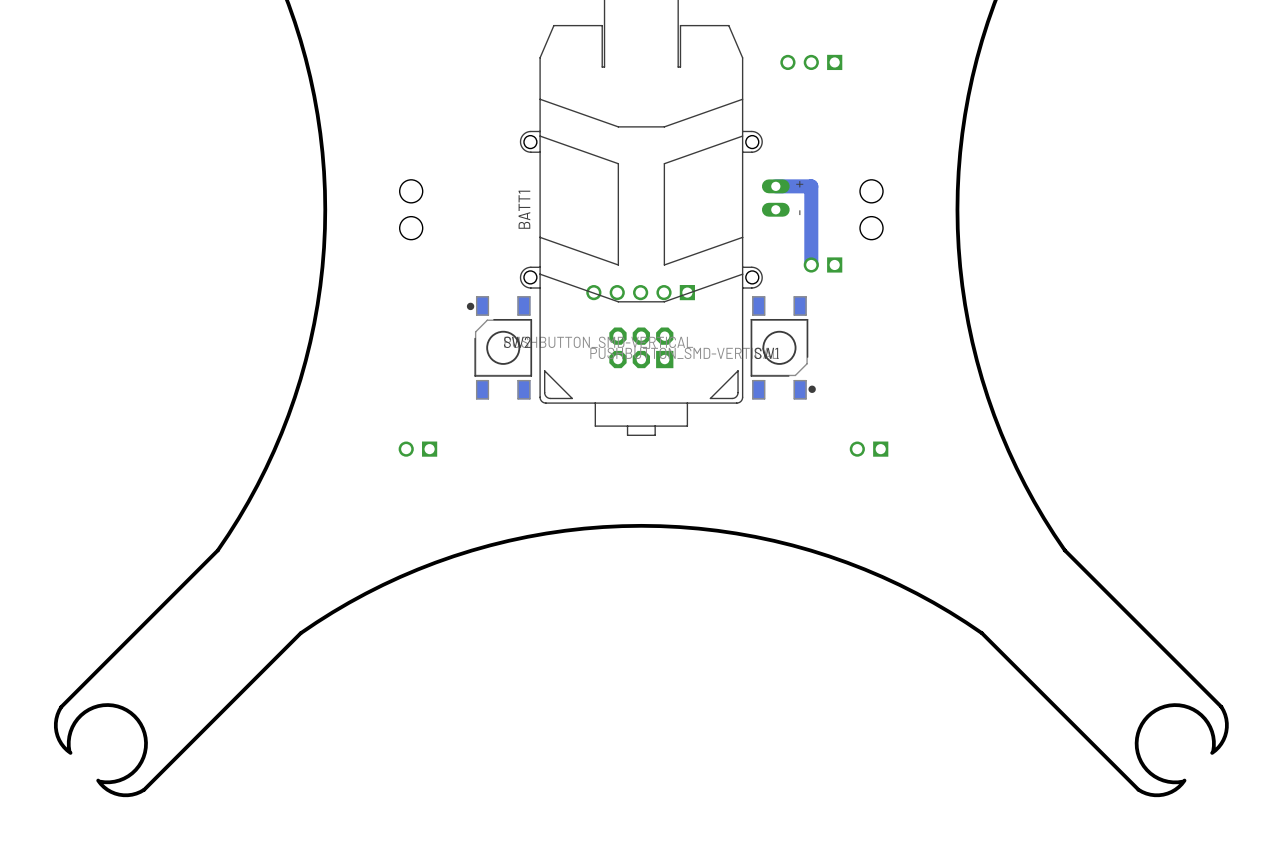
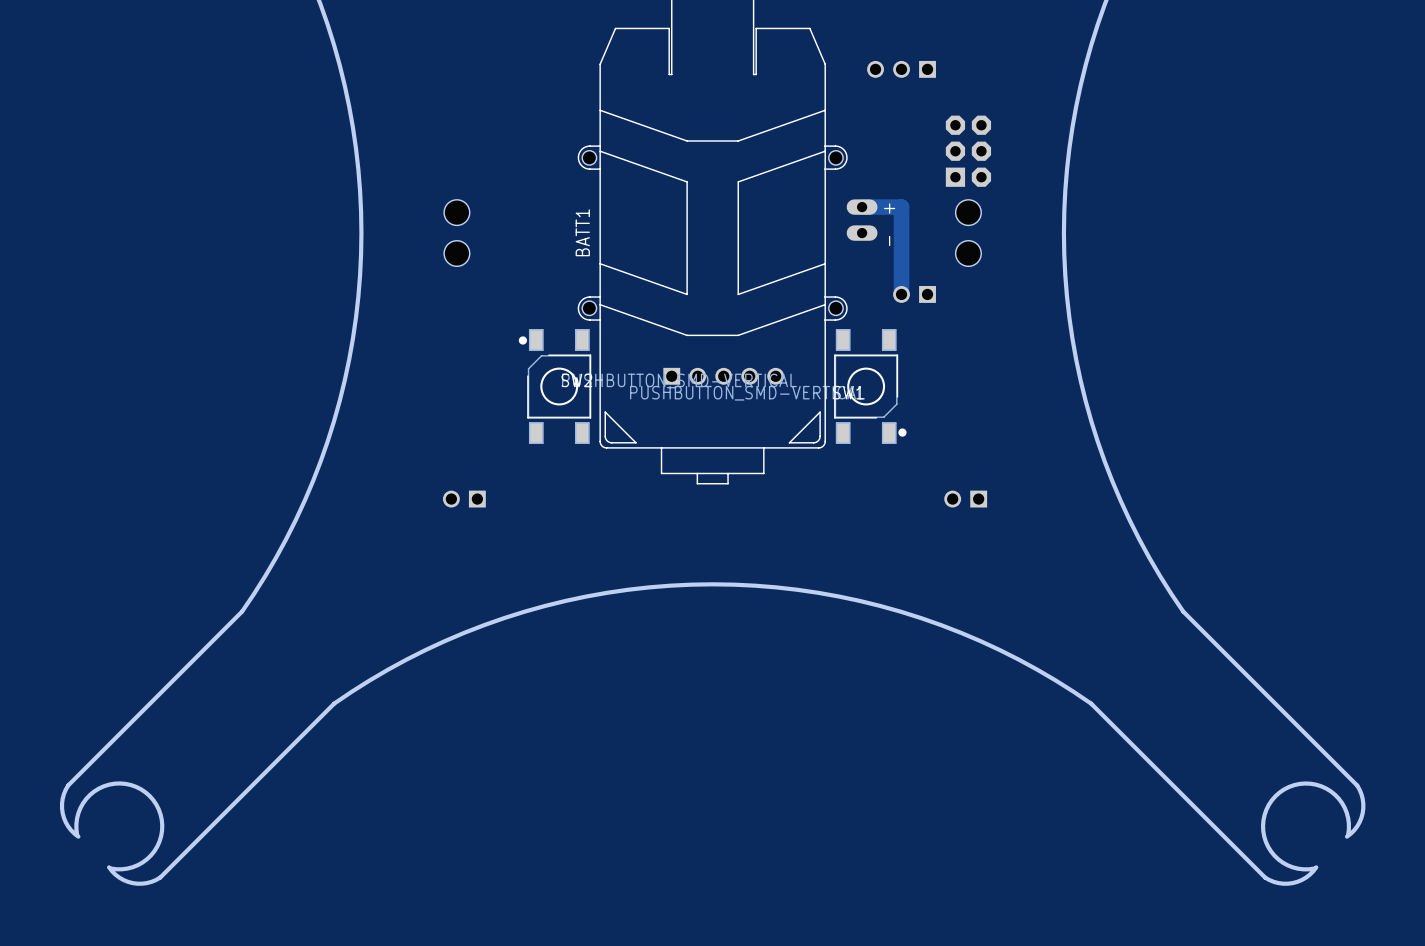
part: none -> (968, 151)
part rotation: 0° (640, 292) -> 180° (723, 376)
part: (641, 347) -> none

